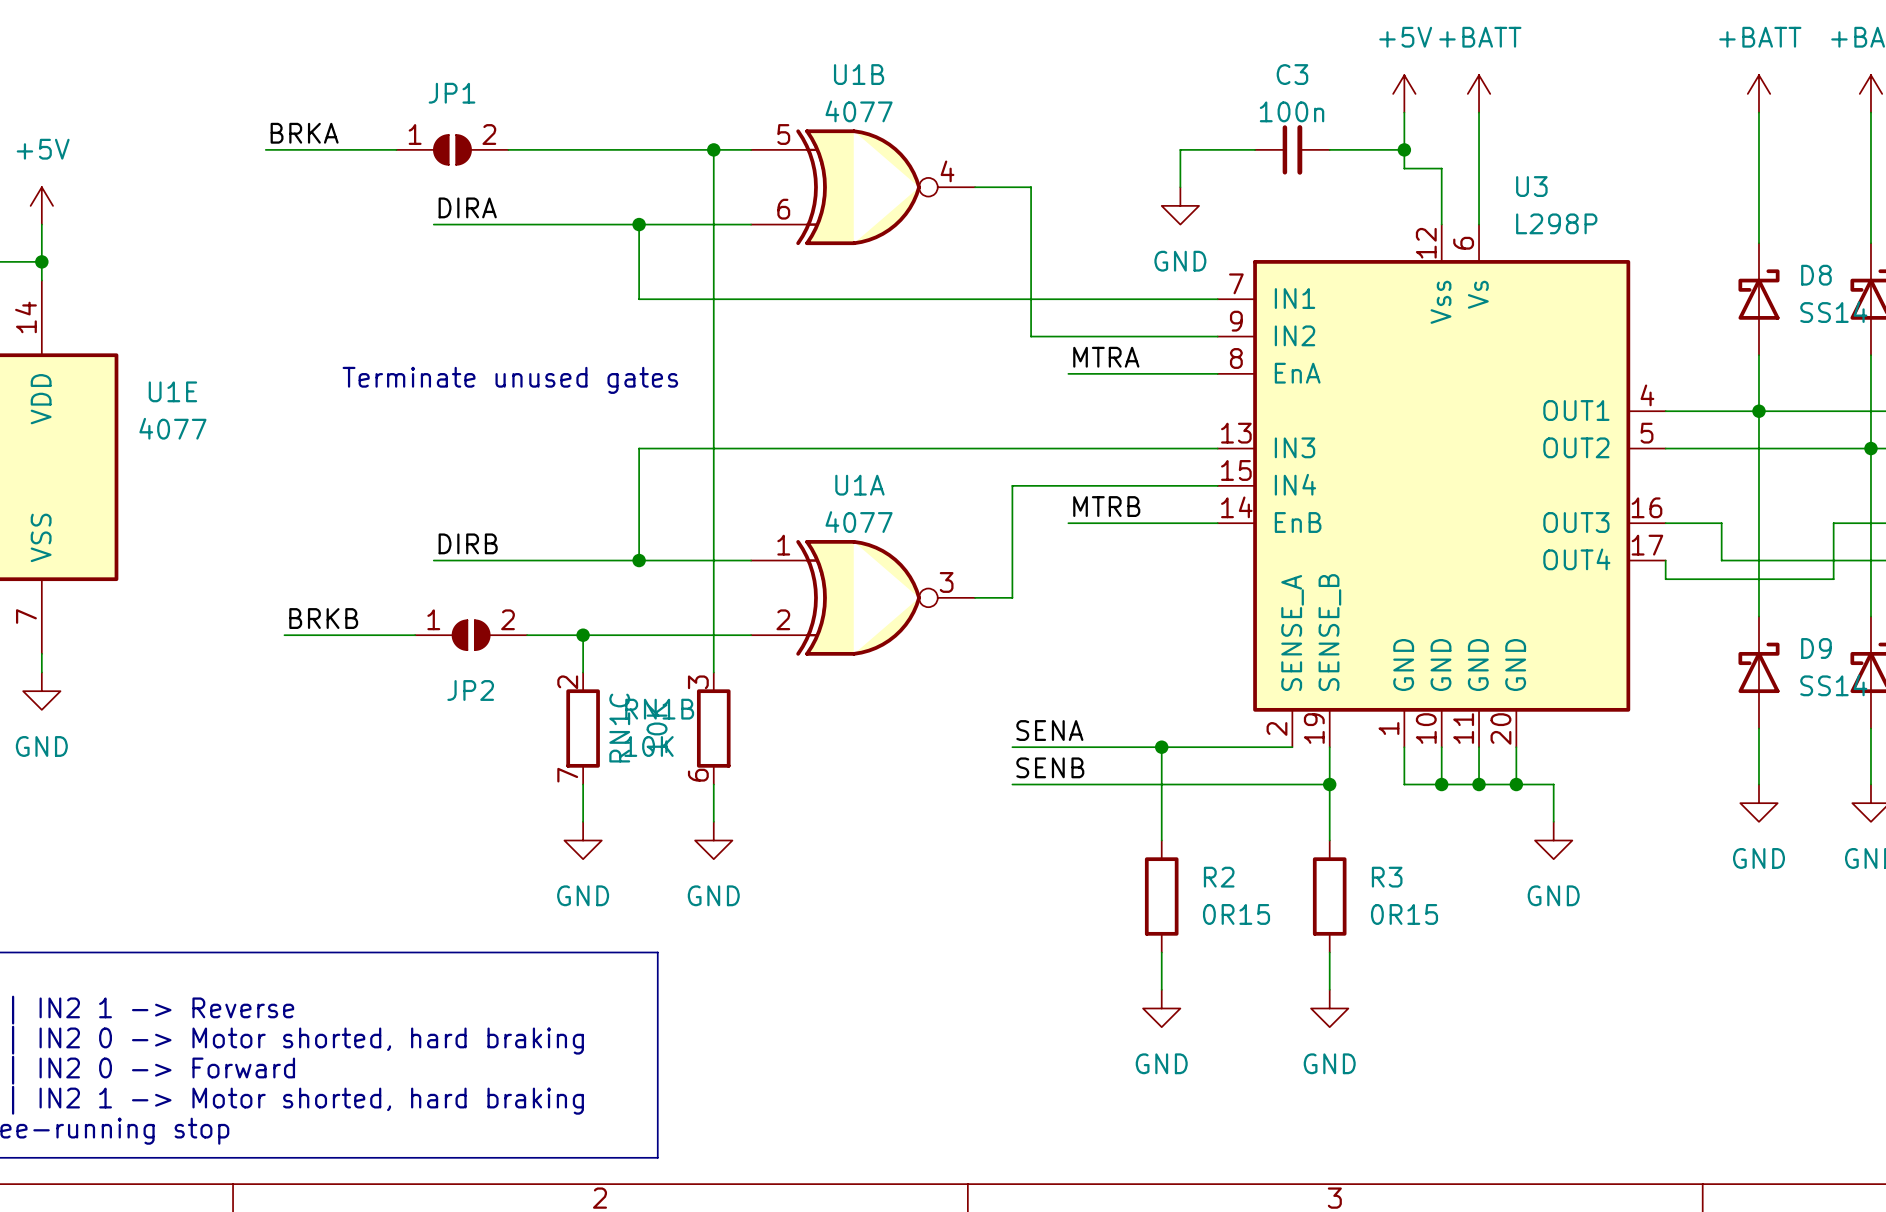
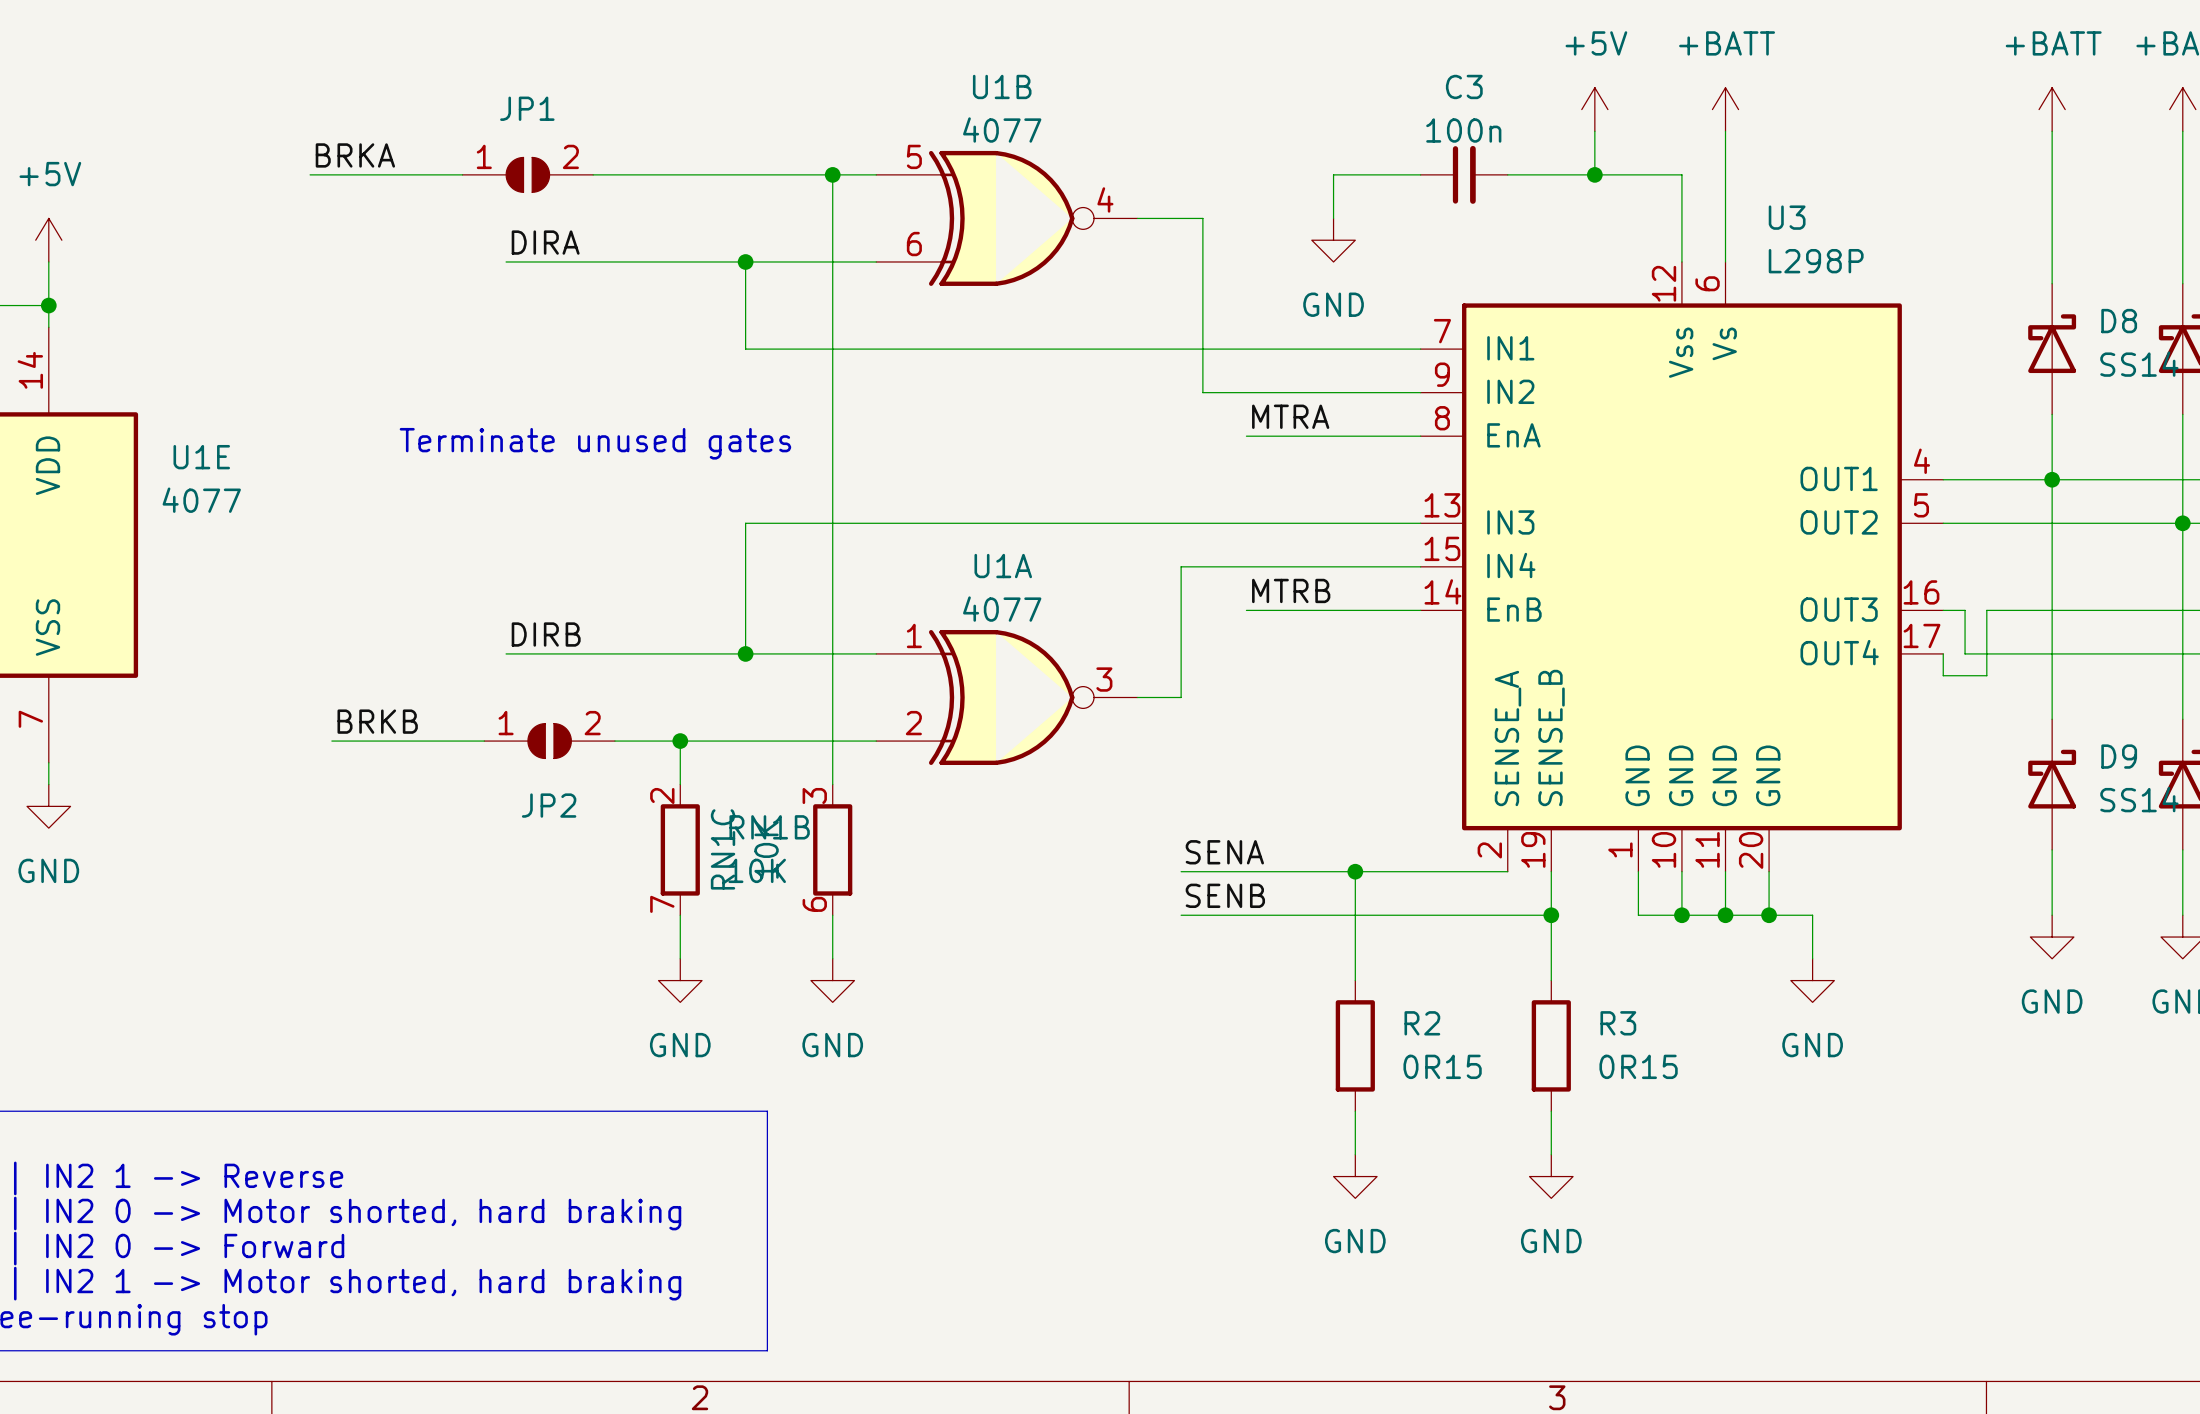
power symbol position: +5V (1404, 93) -> +5V (1594, 109)
wire: none -> (1594, 131) (1594, 174)
wire: (1404, 112) (1404, 168) (1441, 168) -> (1638, 174) (1681, 174) (1681, 196)
wire: (1180, 149) (1180, 187) -> (1377, 174) (1333, 174) (1333, 218)
C3 position: (1292, 149) -> (1464, 174)
junction position: (1404, 149) -> (1594, 174)
power symbol position: GND (1180, 205) -> GND (1333, 240)
wire: (1684, 523) (1703, 523) -> (1986, 675) (1986, 610)
wire: (1721, 523) (1721, 560) -> (1965, 610) (1965, 653) (2008, 653)
wire: (1833, 523) (1833, 579) (1703, 579) -> (2139, 610) (2008, 610)

